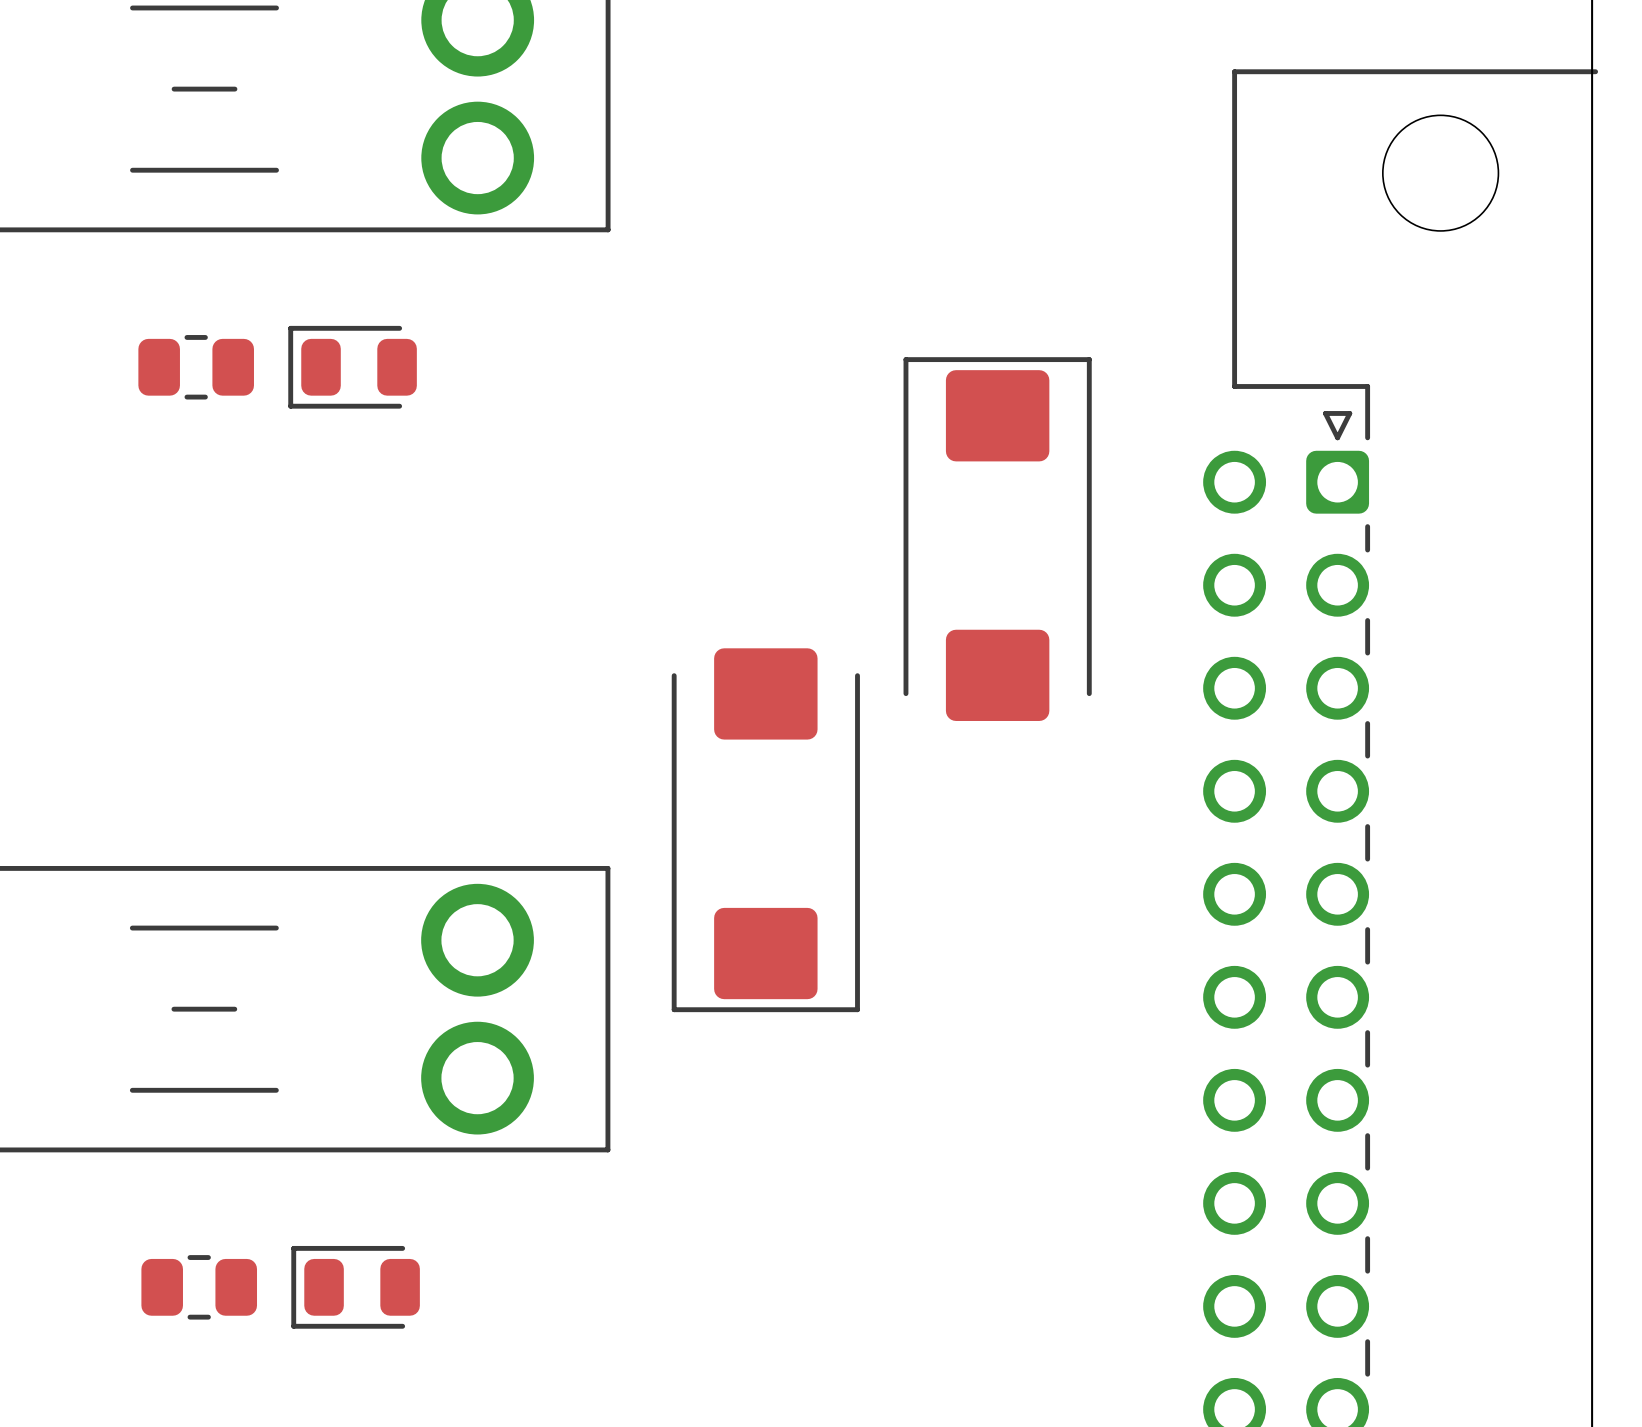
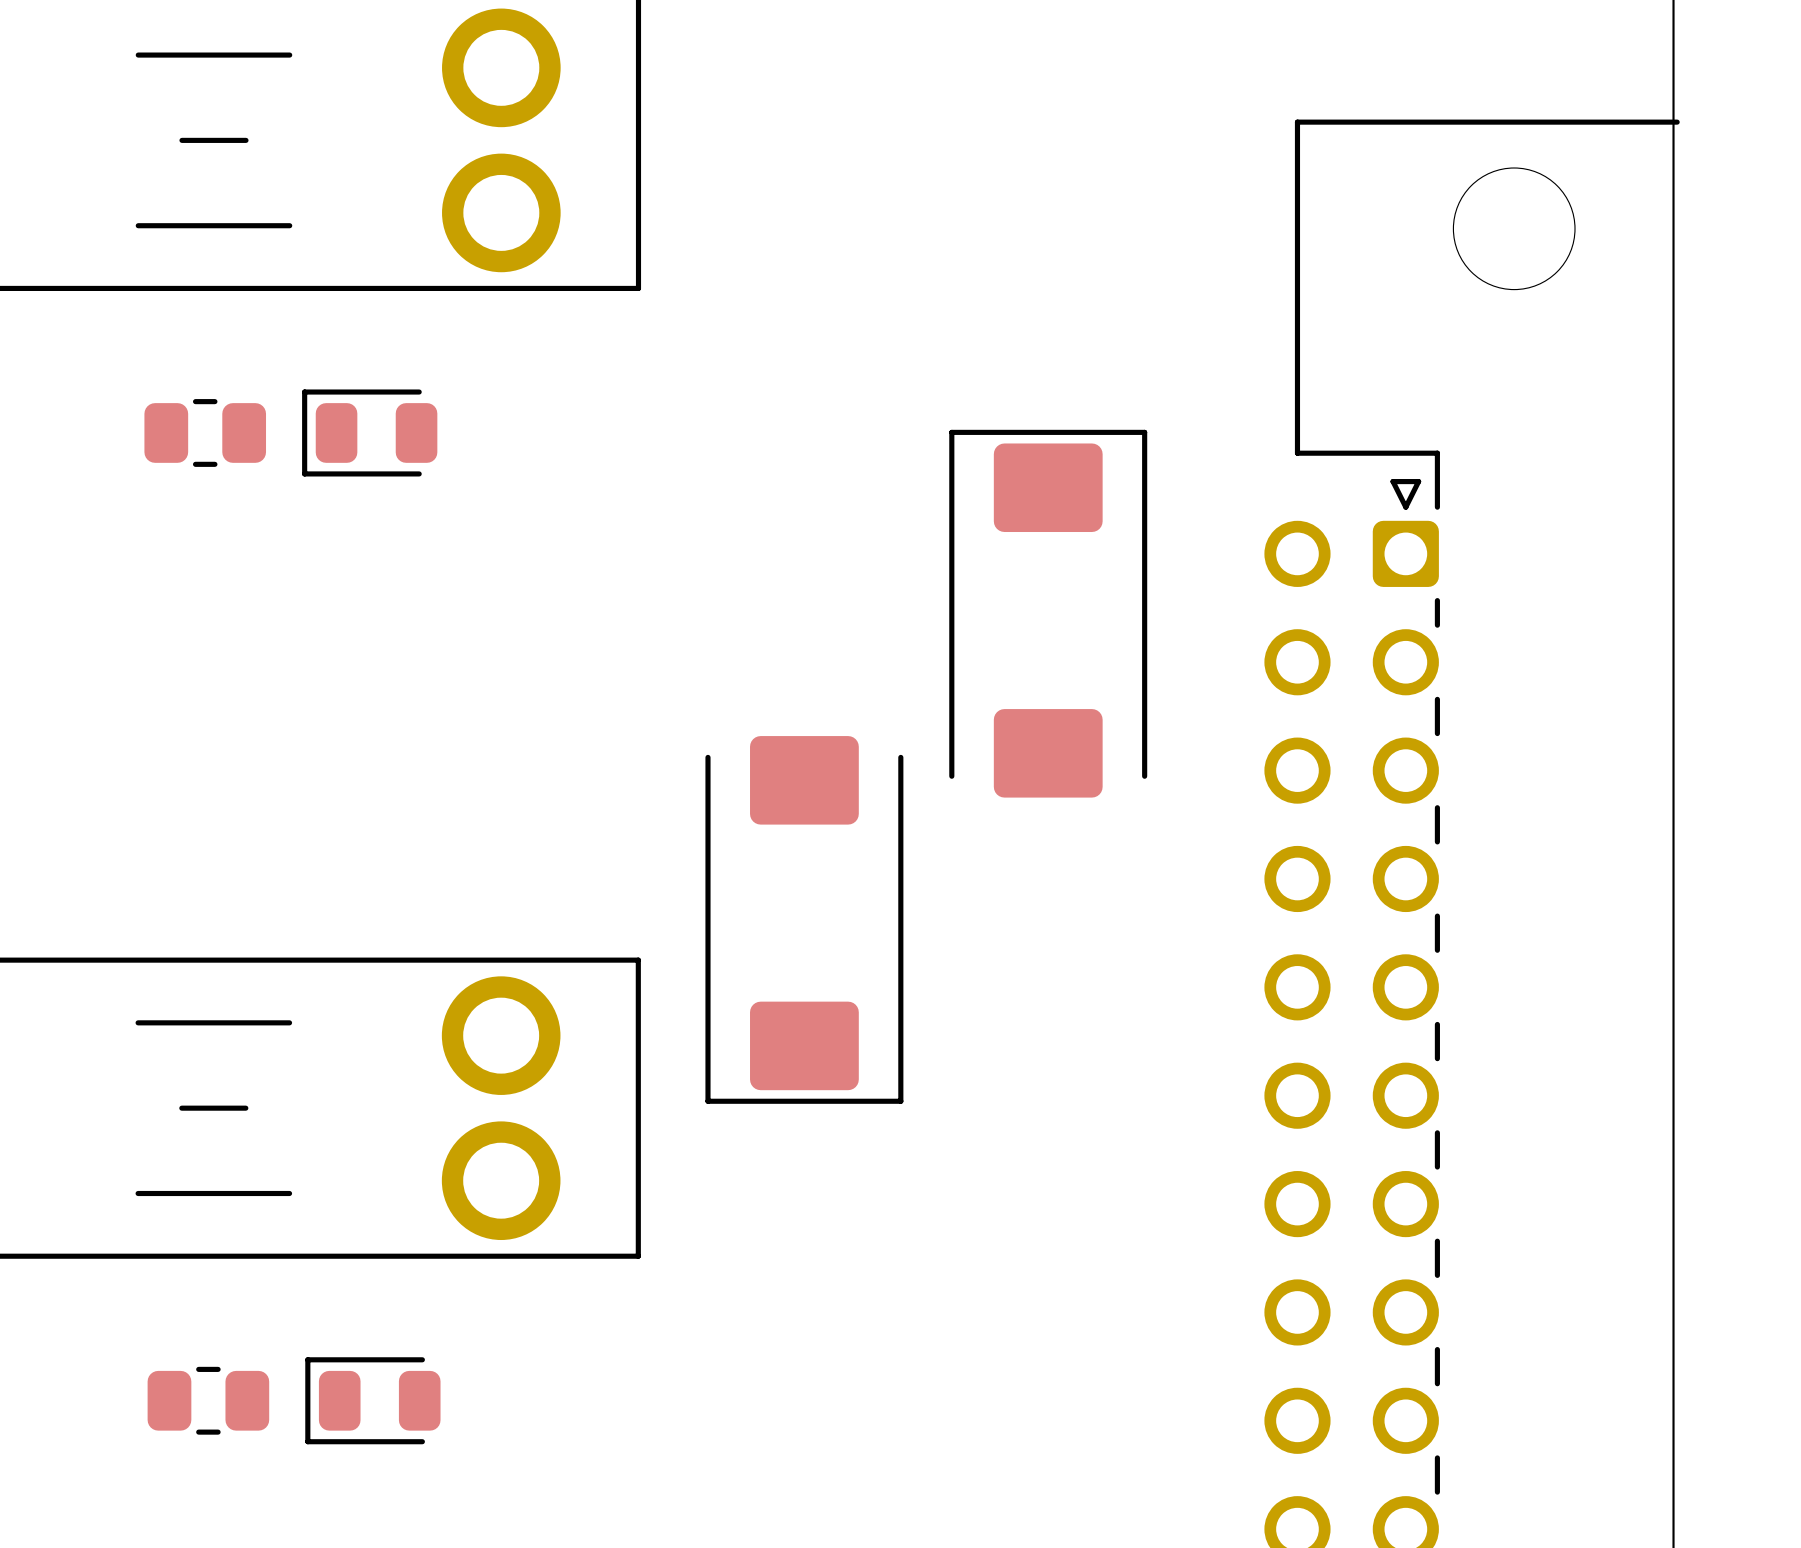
part footprint: [903, 357, 1092, 721] -> [949, 429, 1148, 798]
part footprint: [671, 648, 860, 1013] -> [705, 736, 904, 1104]

